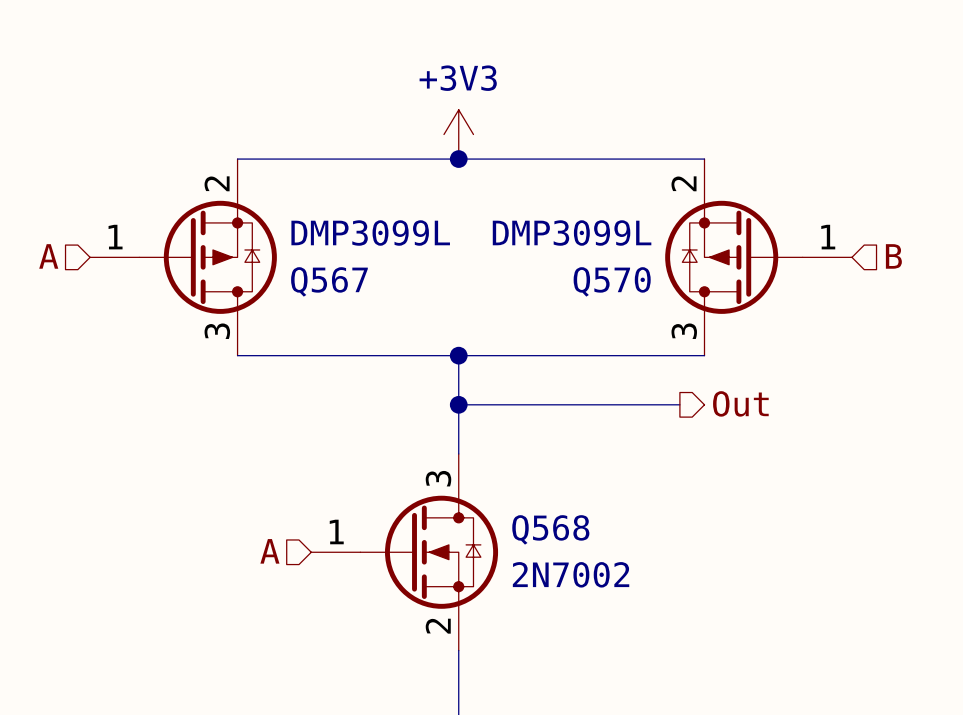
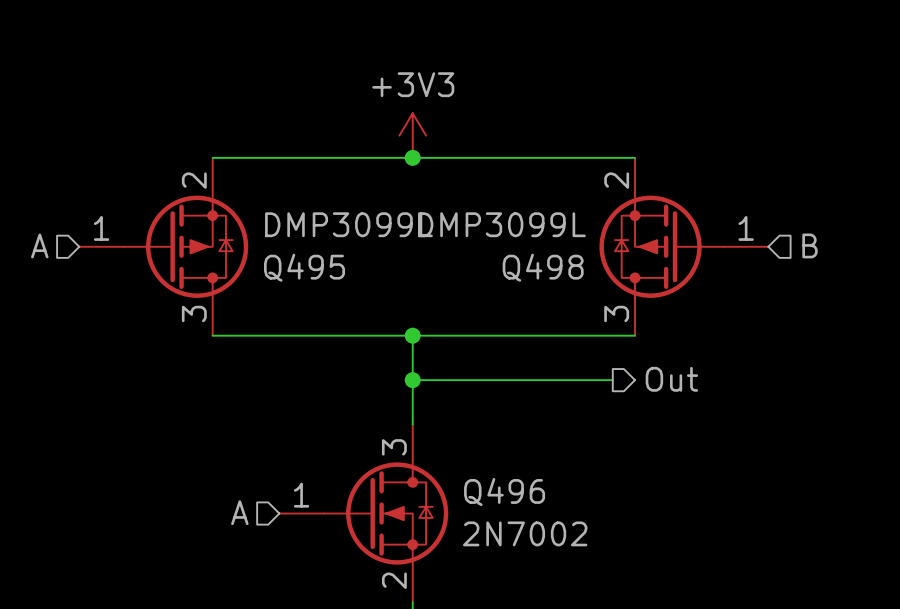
Q567 name: Q567 (329, 281) -> Q495 (304, 267)
Q570 name: Q570 (612, 281) -> Q498 (543, 267)
Q568 name: Q568 (550, 529) -> Q496 (504, 491)

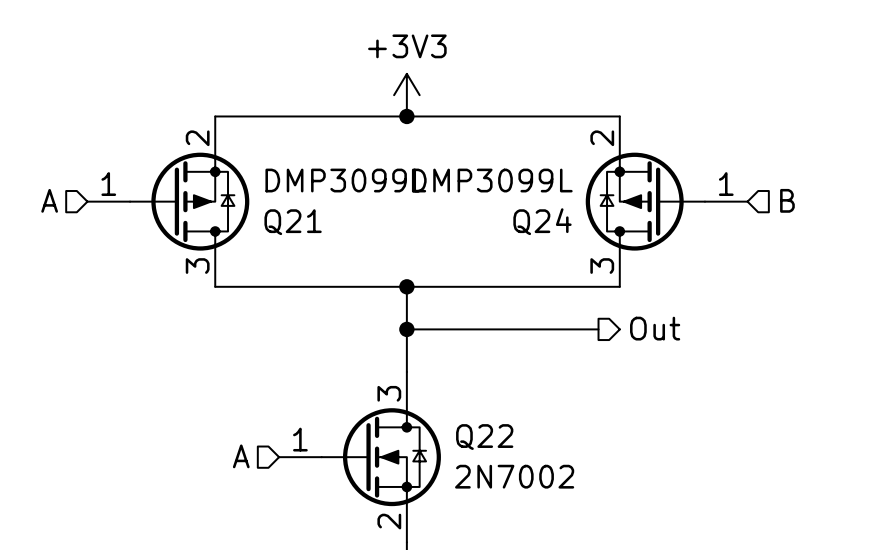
Q495 name: Q495 (304, 267) -> Q21 (293, 222)
Q498 name: Q498 (543, 267) -> Q24 (542, 221)
Q496 name: Q496 (504, 491) -> Q22 (484, 437)

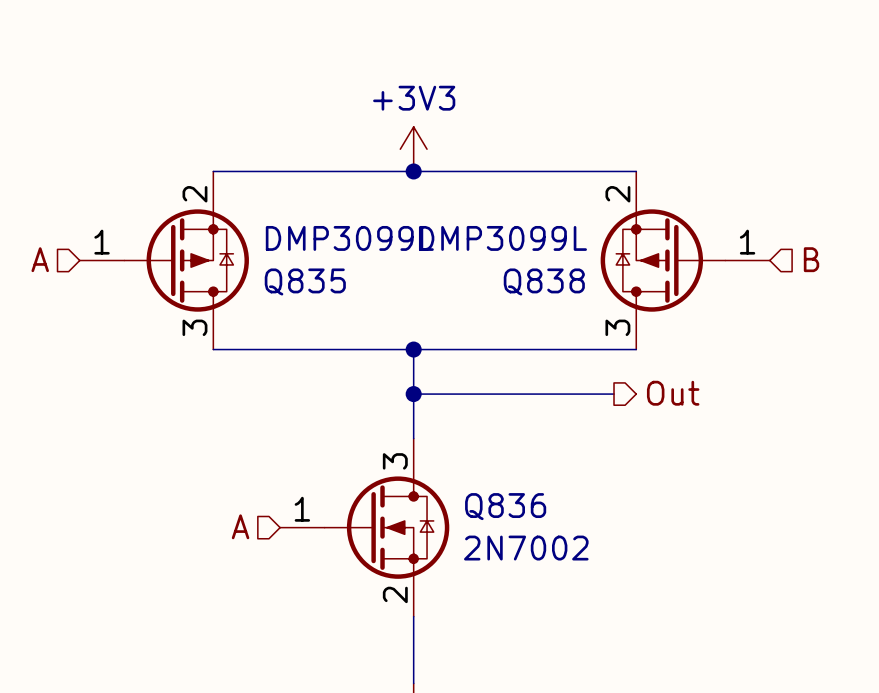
Q24 name: Q24 (542, 221) -> Q838 (544, 281)
Q21 name: Q21 (293, 222) -> Q835 (305, 281)
Q22 name: Q22 (484, 437) -> Q836 (505, 506)

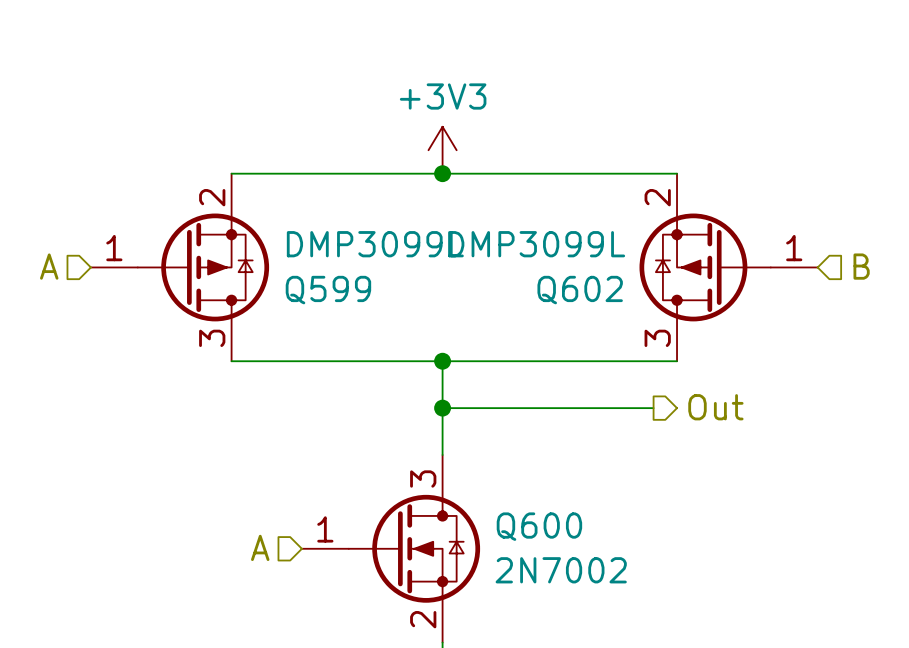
Q835 name: Q835 (305, 281) -> Q599 (328, 290)
Q838 name: Q838 (544, 281) -> Q602 (580, 290)
Q836 name: Q836 (505, 506) -> Q600 (539, 526)

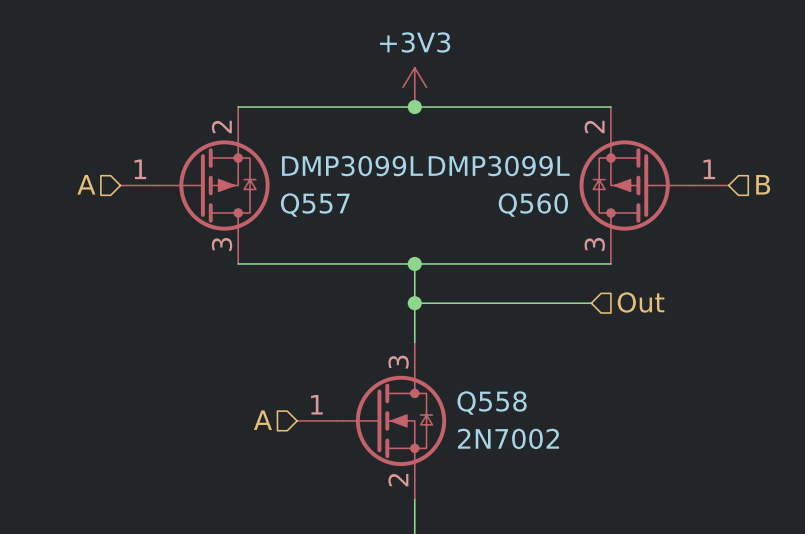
Q599 name: Q599 (328, 290) -> Q557 (315, 205)
Q602 name: Q602 (580, 290) -> Q560 (533, 205)
hierarchical label shape: output (715, 407) -> input (641, 302)
Q600 name: Q600 (539, 526) -> Q558 (492, 403)

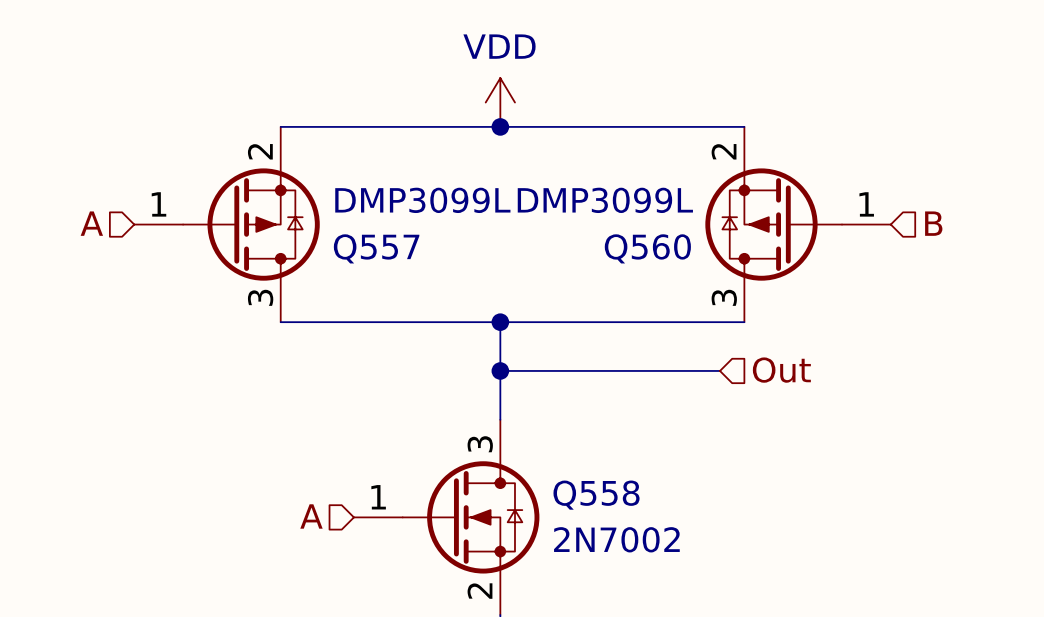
power symbol: +3V3 (414, 87) -> VDD (500, 102)

